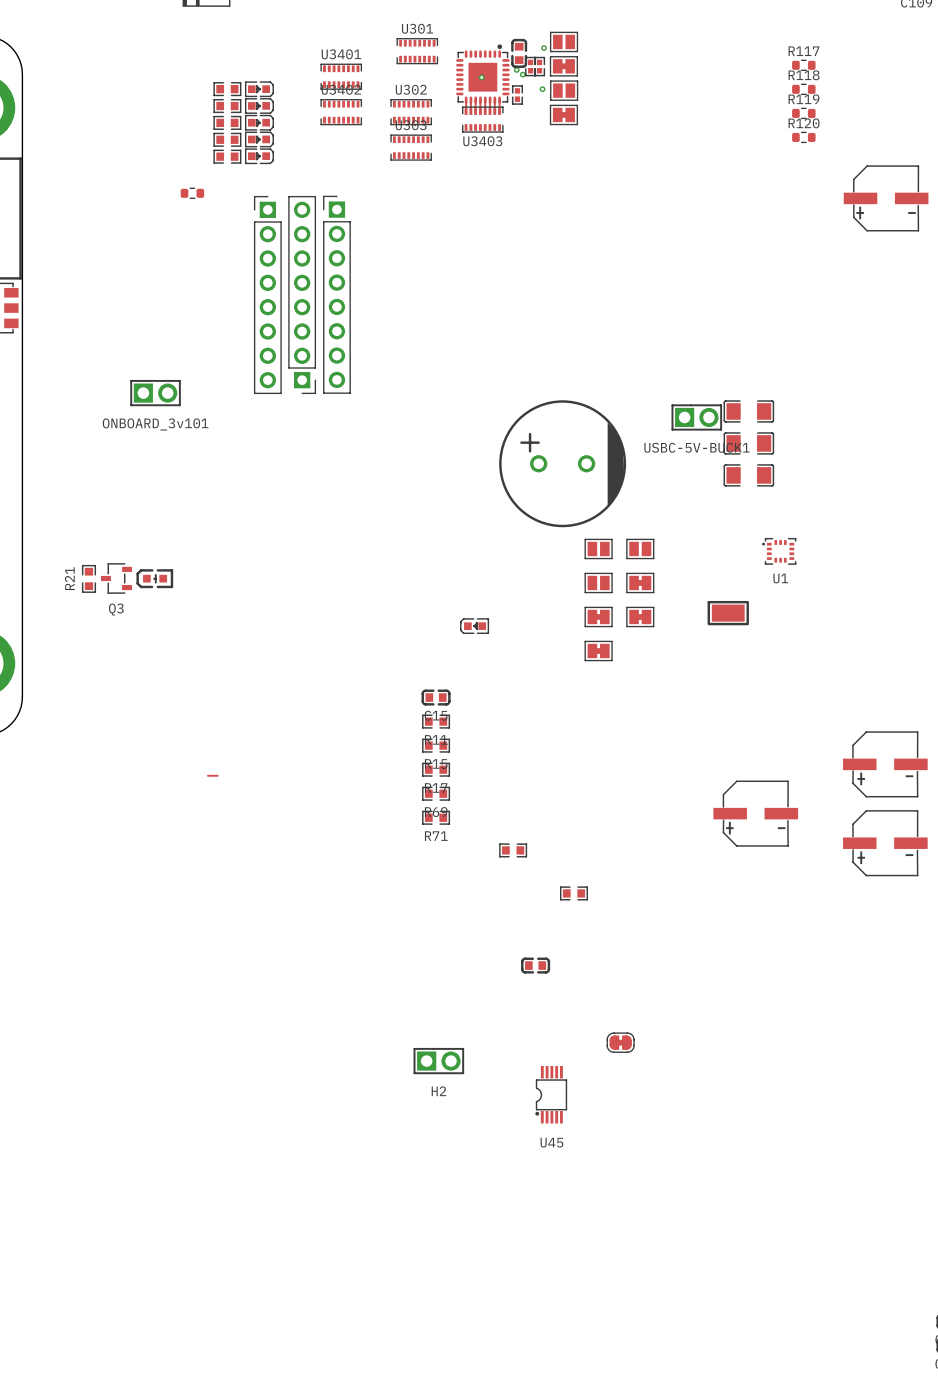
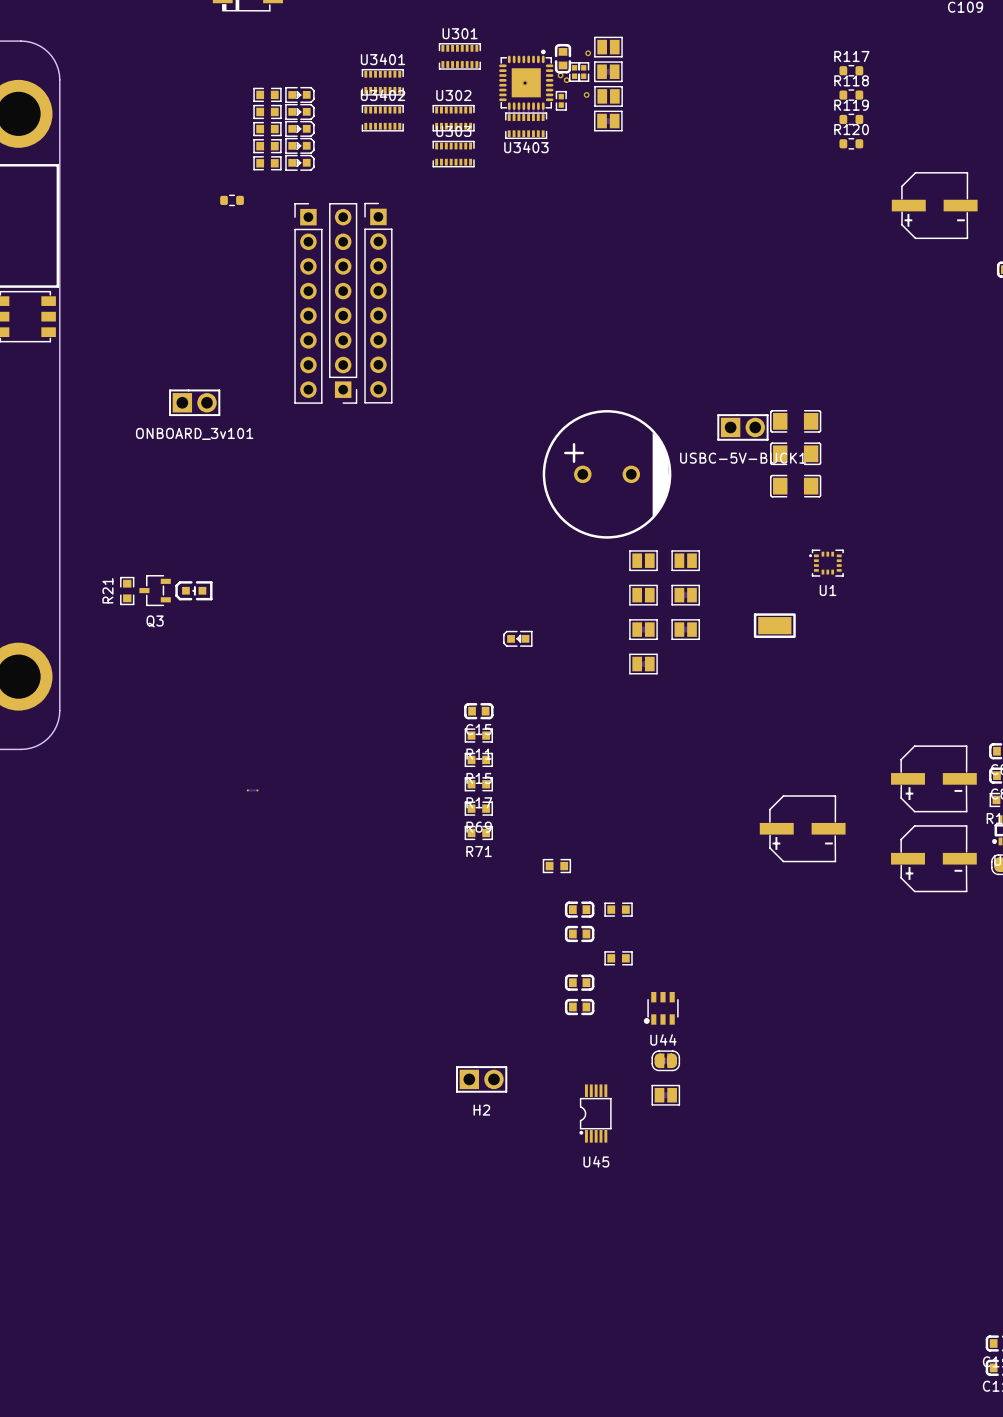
part: none -> (579, 909)
part: none -> (579, 933)
part: none -> (618, 958)
part: none -> (579, 1007)
U44: none -> (661, 1008)
part: none -> (665, 1095)

